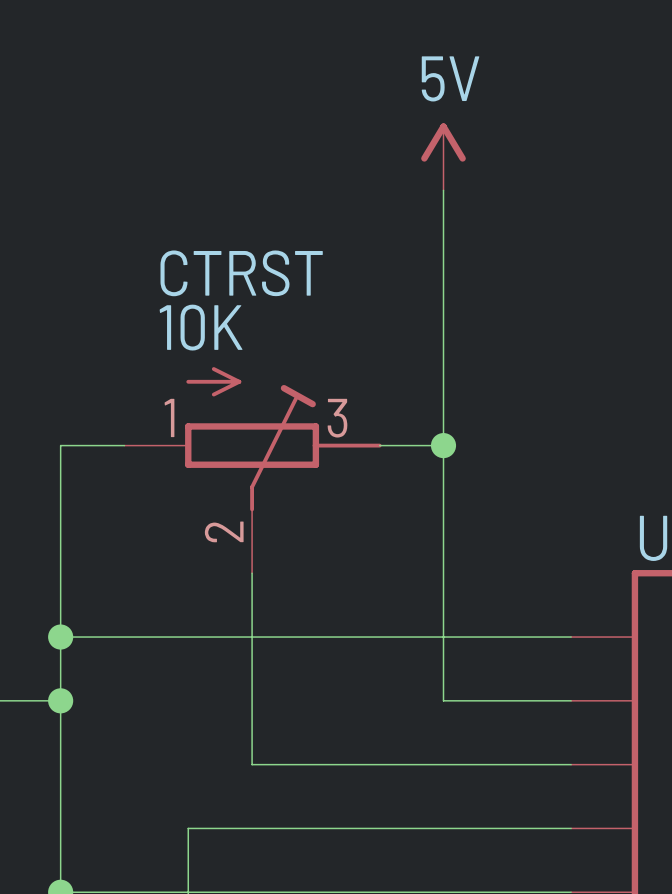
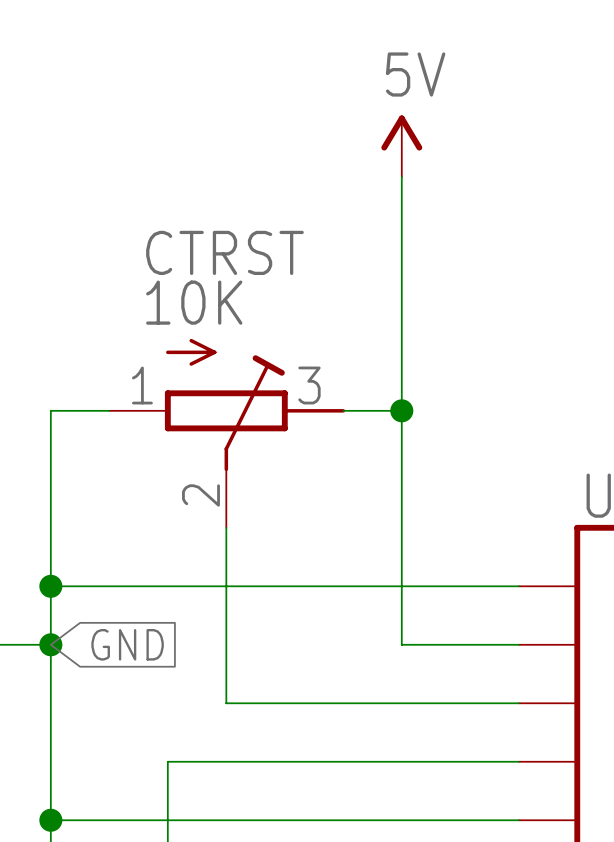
global label: none -> GND (127, 644)

